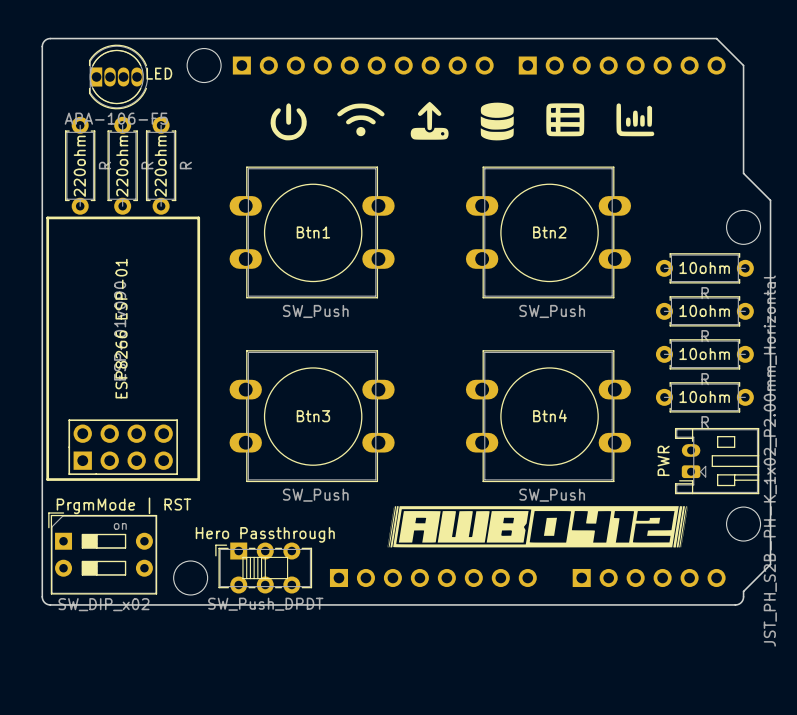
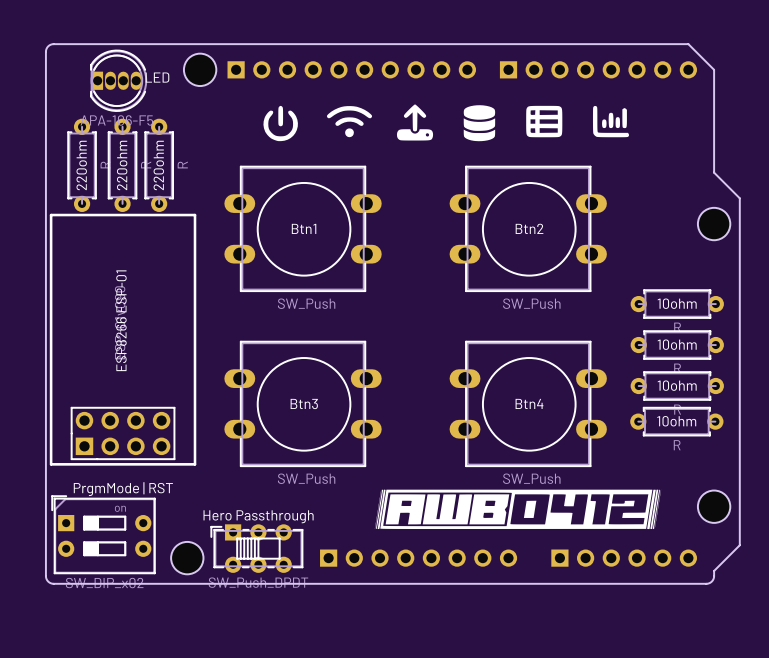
10ohm position: (704, 268) -> (676, 421)
PWR: JST_PH_S2B-PH-K_1x02_P2.00mm_Horizontal (717, 461) -> none

